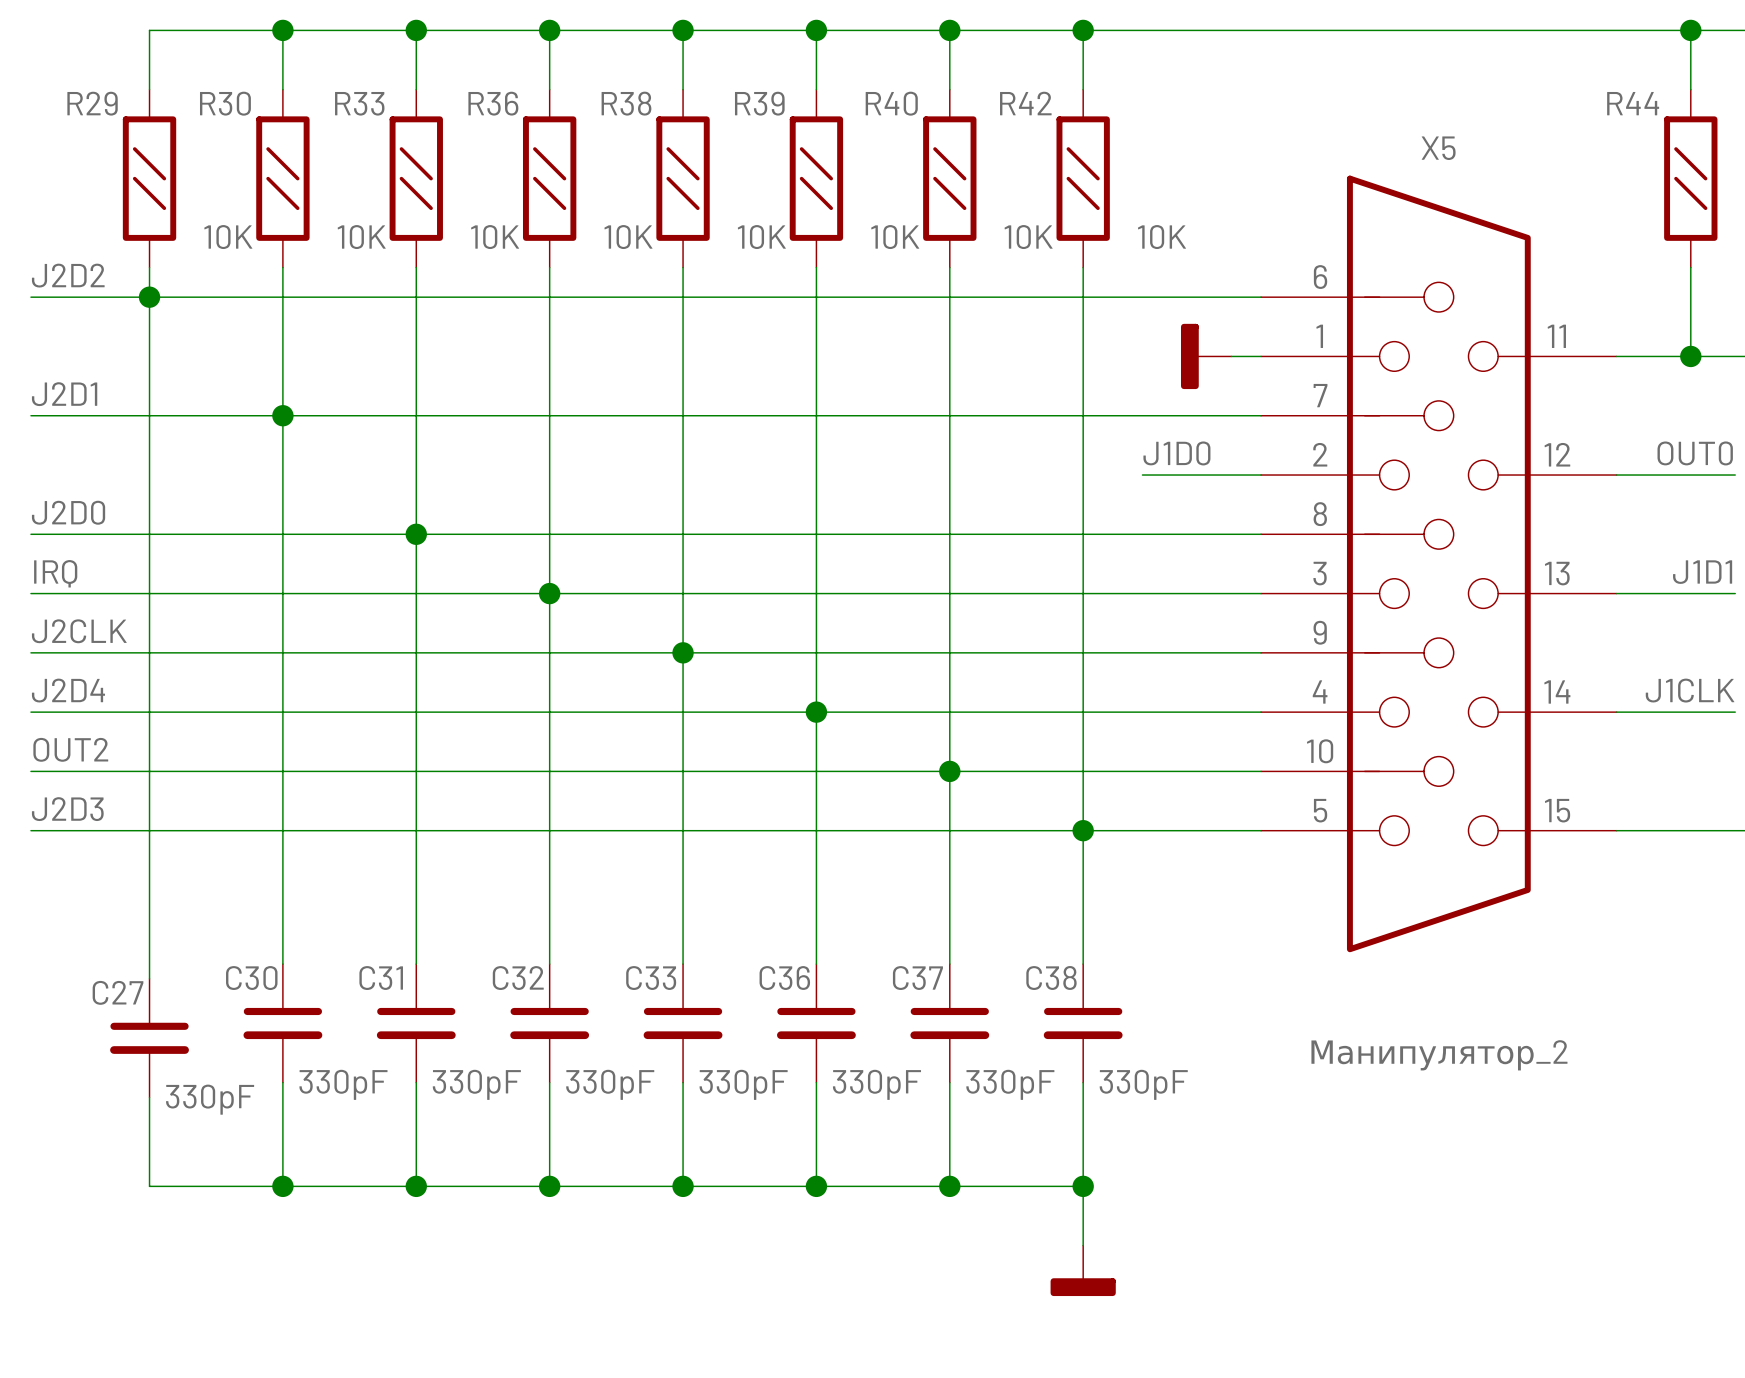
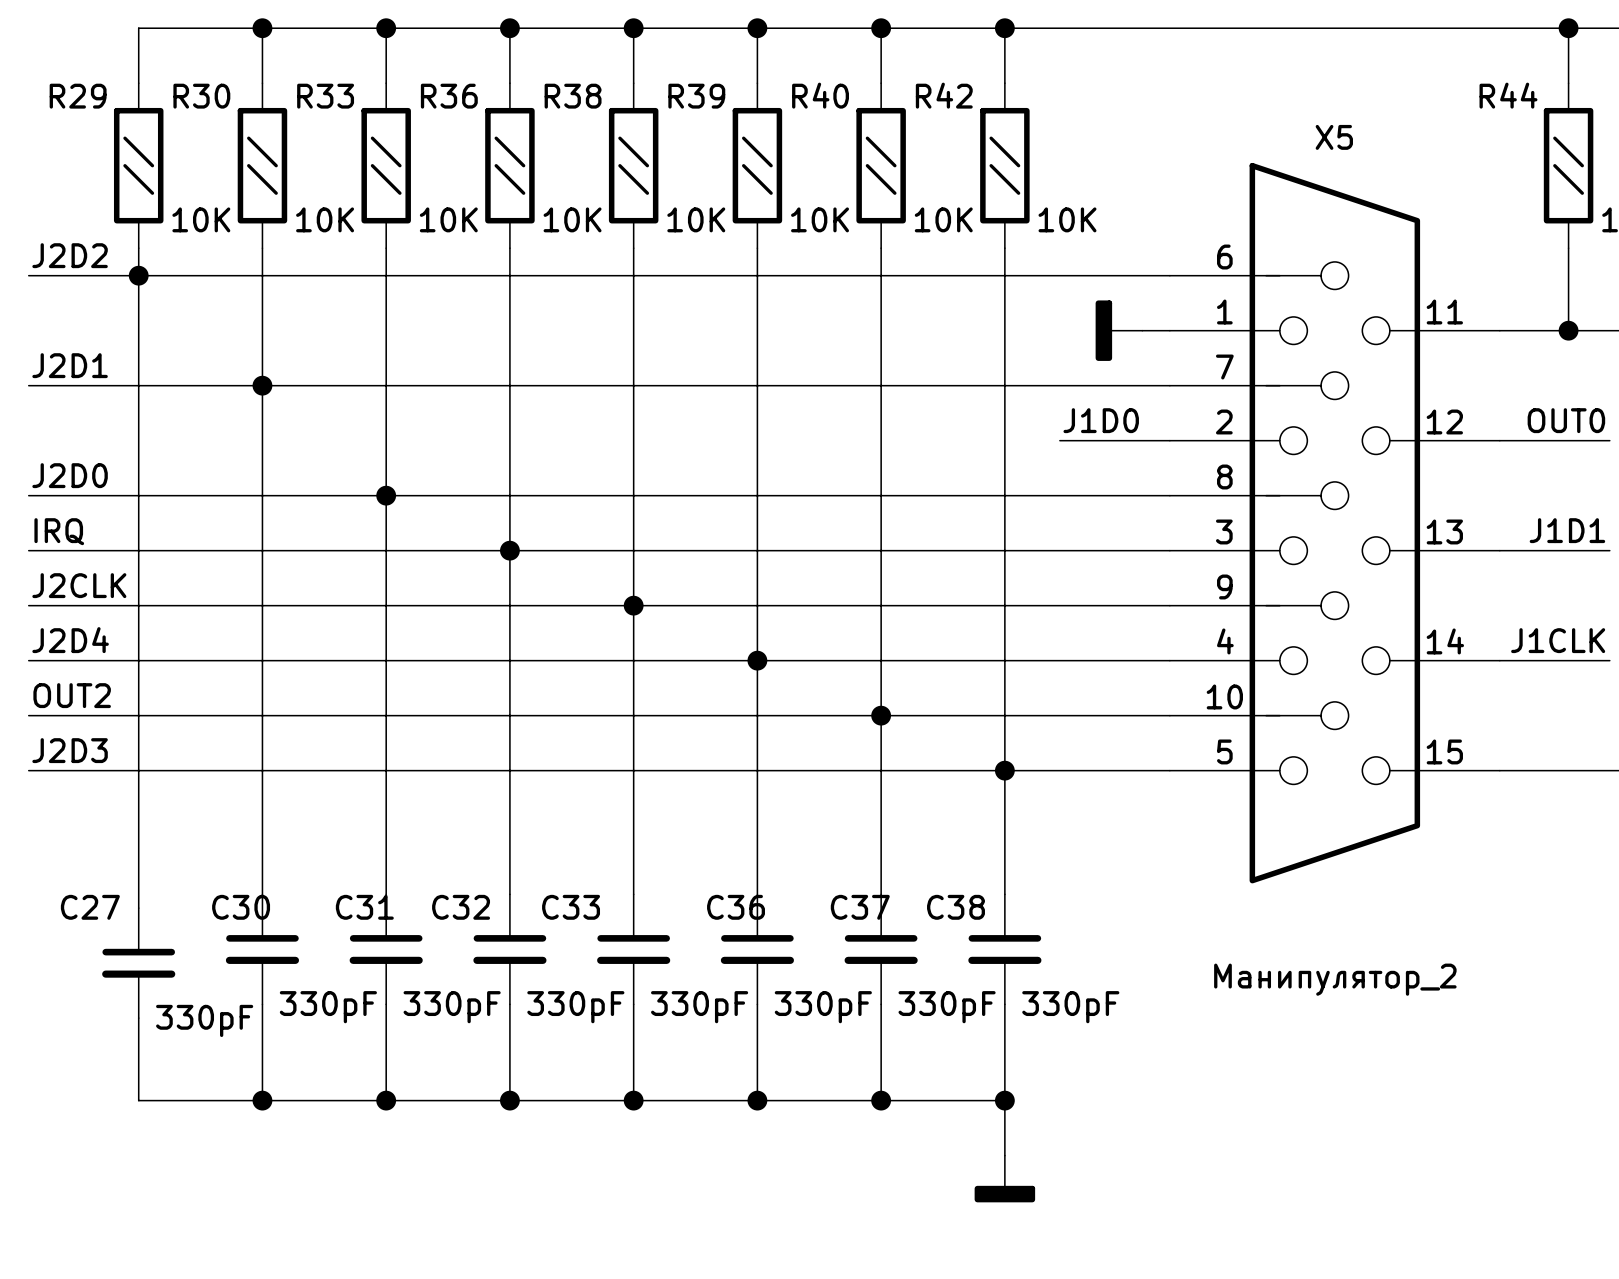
C32 name position: C32 (518, 978) -> C32 (461, 907)
C33 name position: C33 (651, 978) -> C33 (571, 907)
C38 name position: C38 (1051, 978) -> C38 (956, 907)
C27 name position: C27 (118, 992) -> C27 (90, 907)

